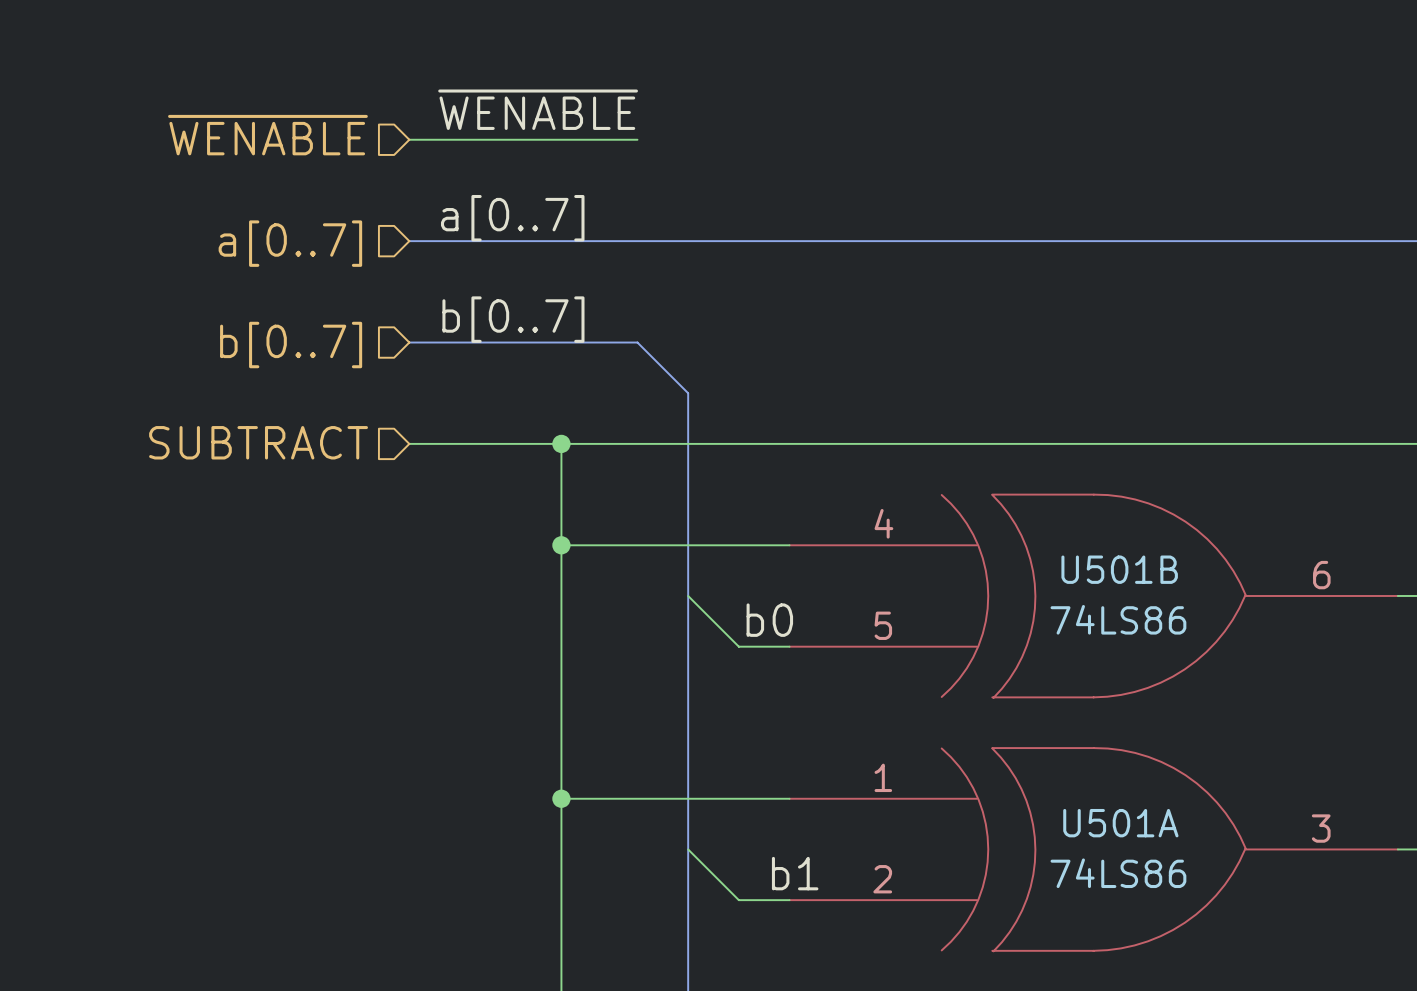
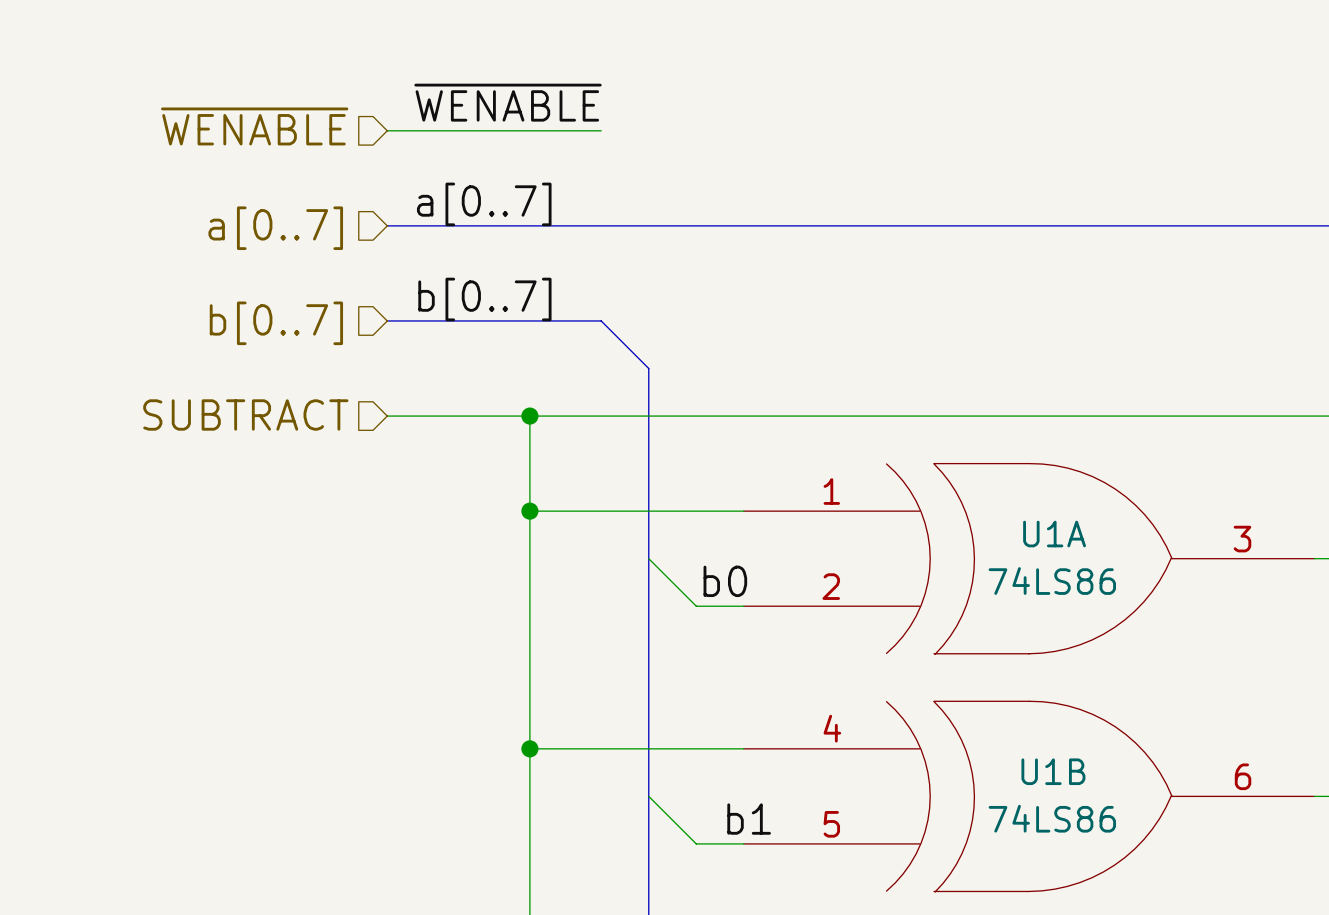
U501B pin number: 4 (883, 523) -> 1 (831, 491)
U501B name: U501B (1119, 569) -> U1A (1054, 534)
U501B pin number: 6 (1321, 575) -> 3 (1242, 539)
U501B pin number: 5 (883, 625) -> 2 (831, 586)
U501A pin number: 1 (883, 777) -> 4 (832, 728)
U501A name: U501A (1120, 823) -> U1B (1053, 771)
U501A pin number: 3 (1321, 828) -> 6 (1243, 776)
U501A pin number: 2 (882, 879) -> 5 (831, 824)

